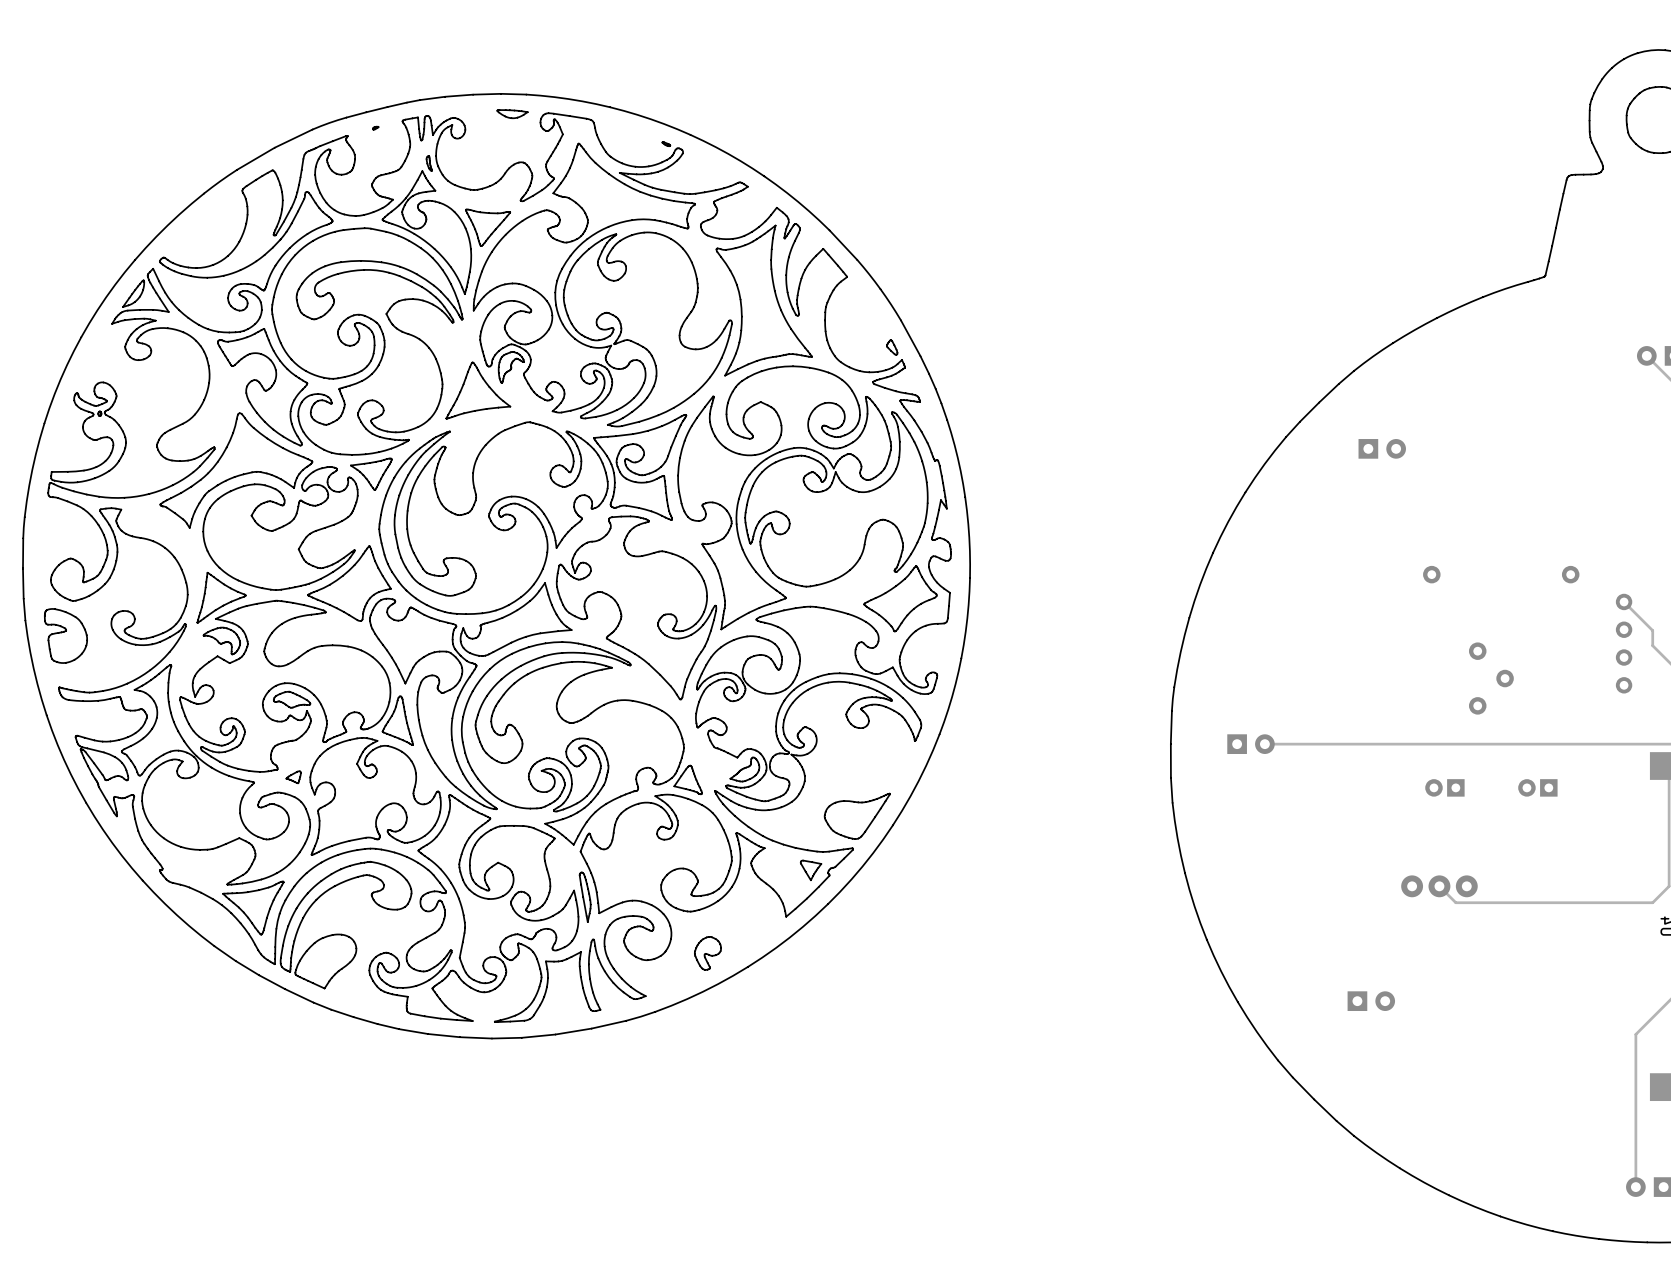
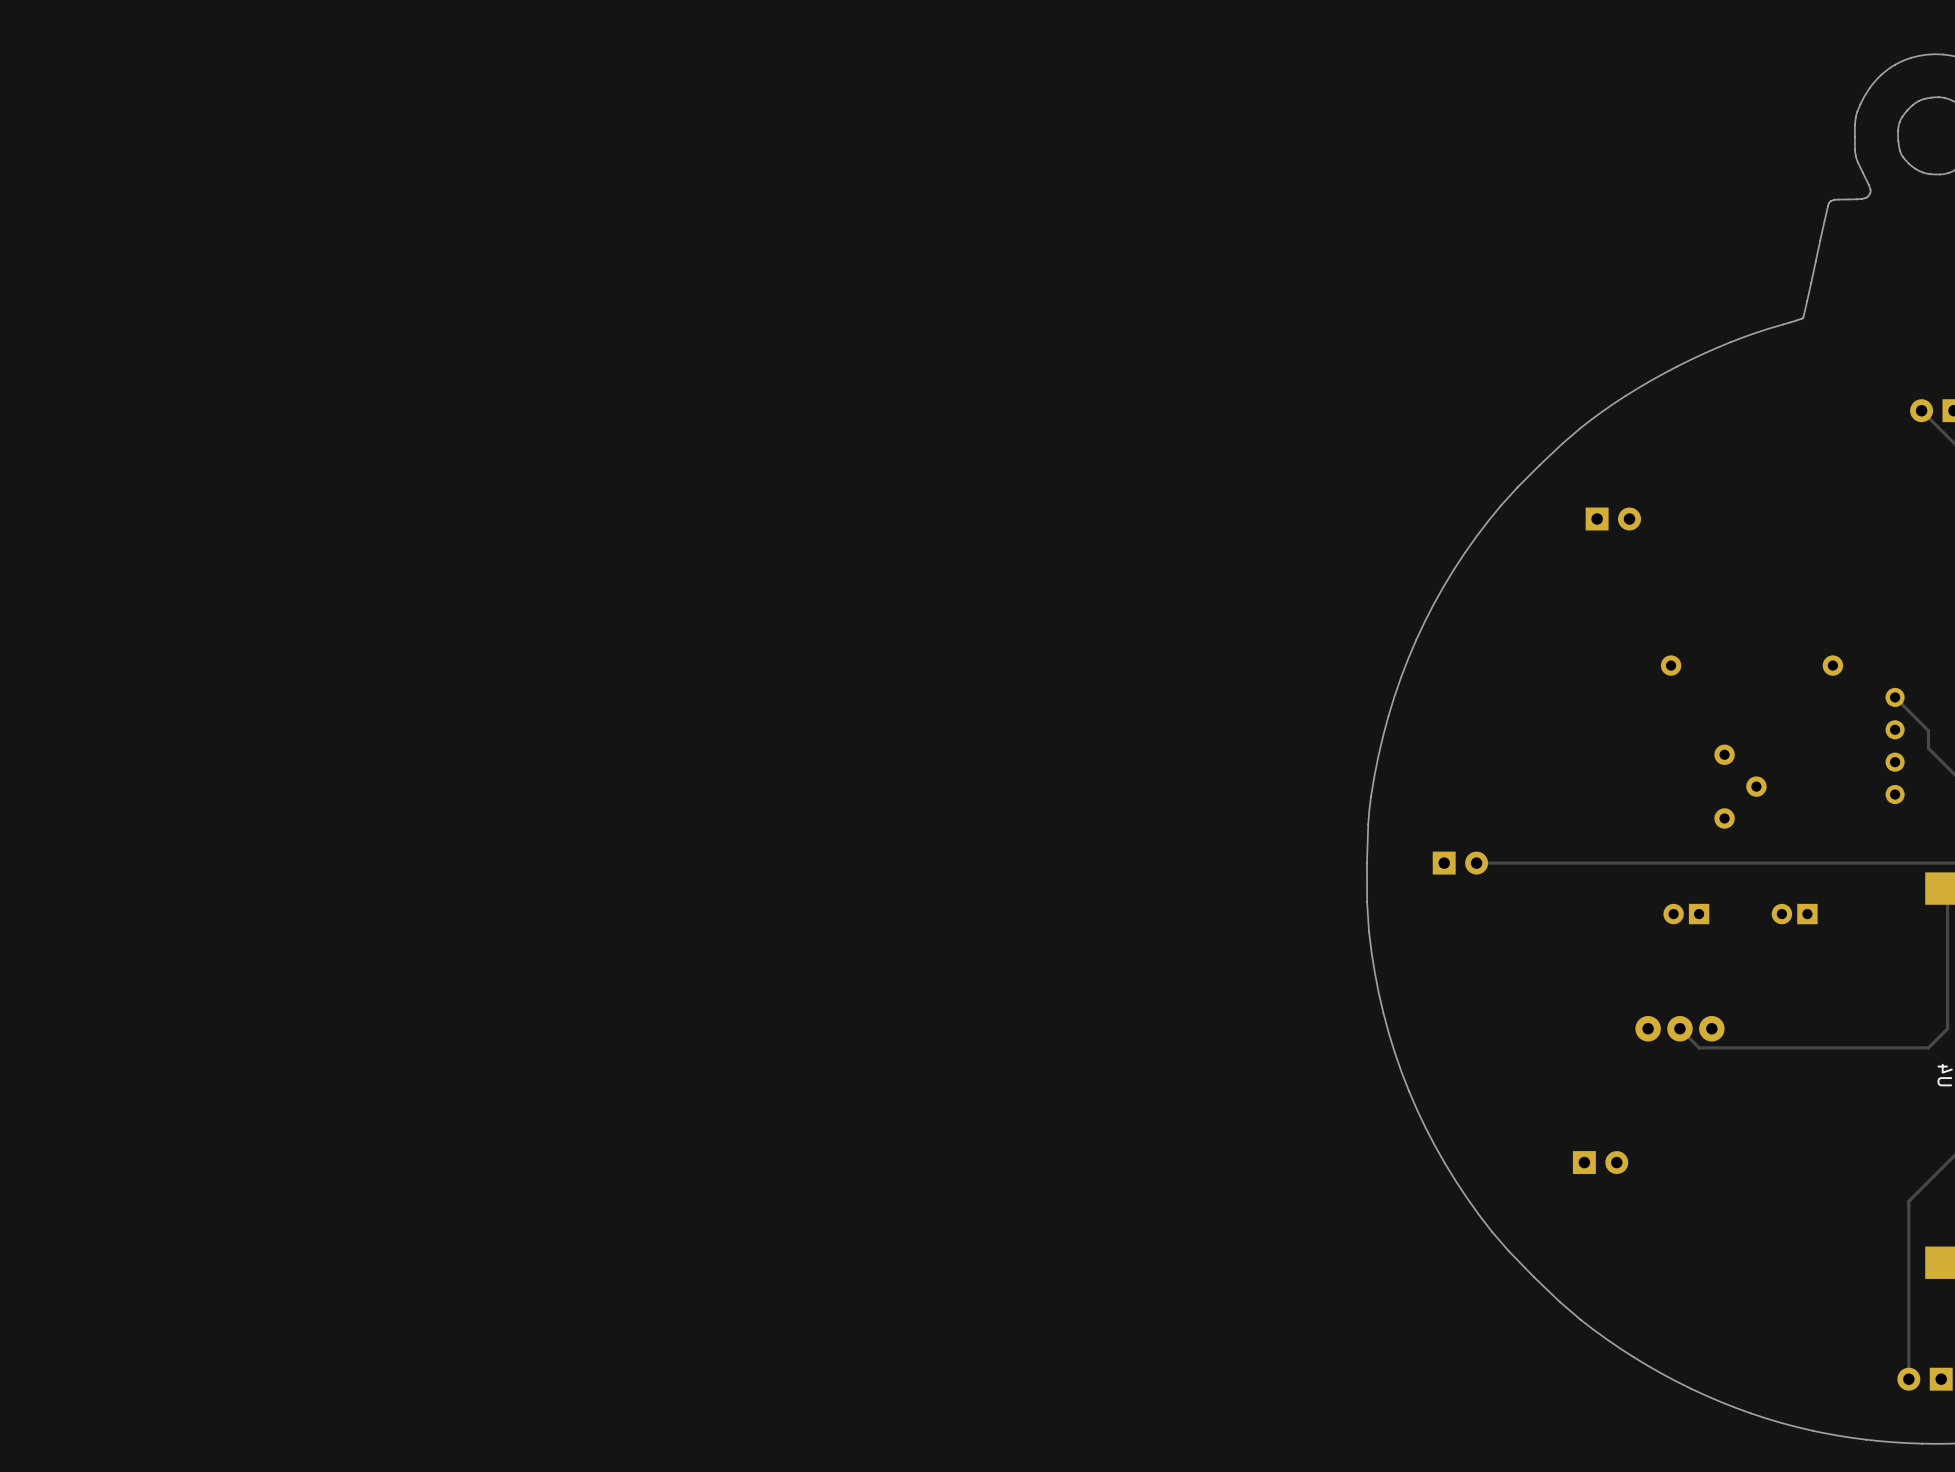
drawing: [22, 93, 971, 1039] -> none

